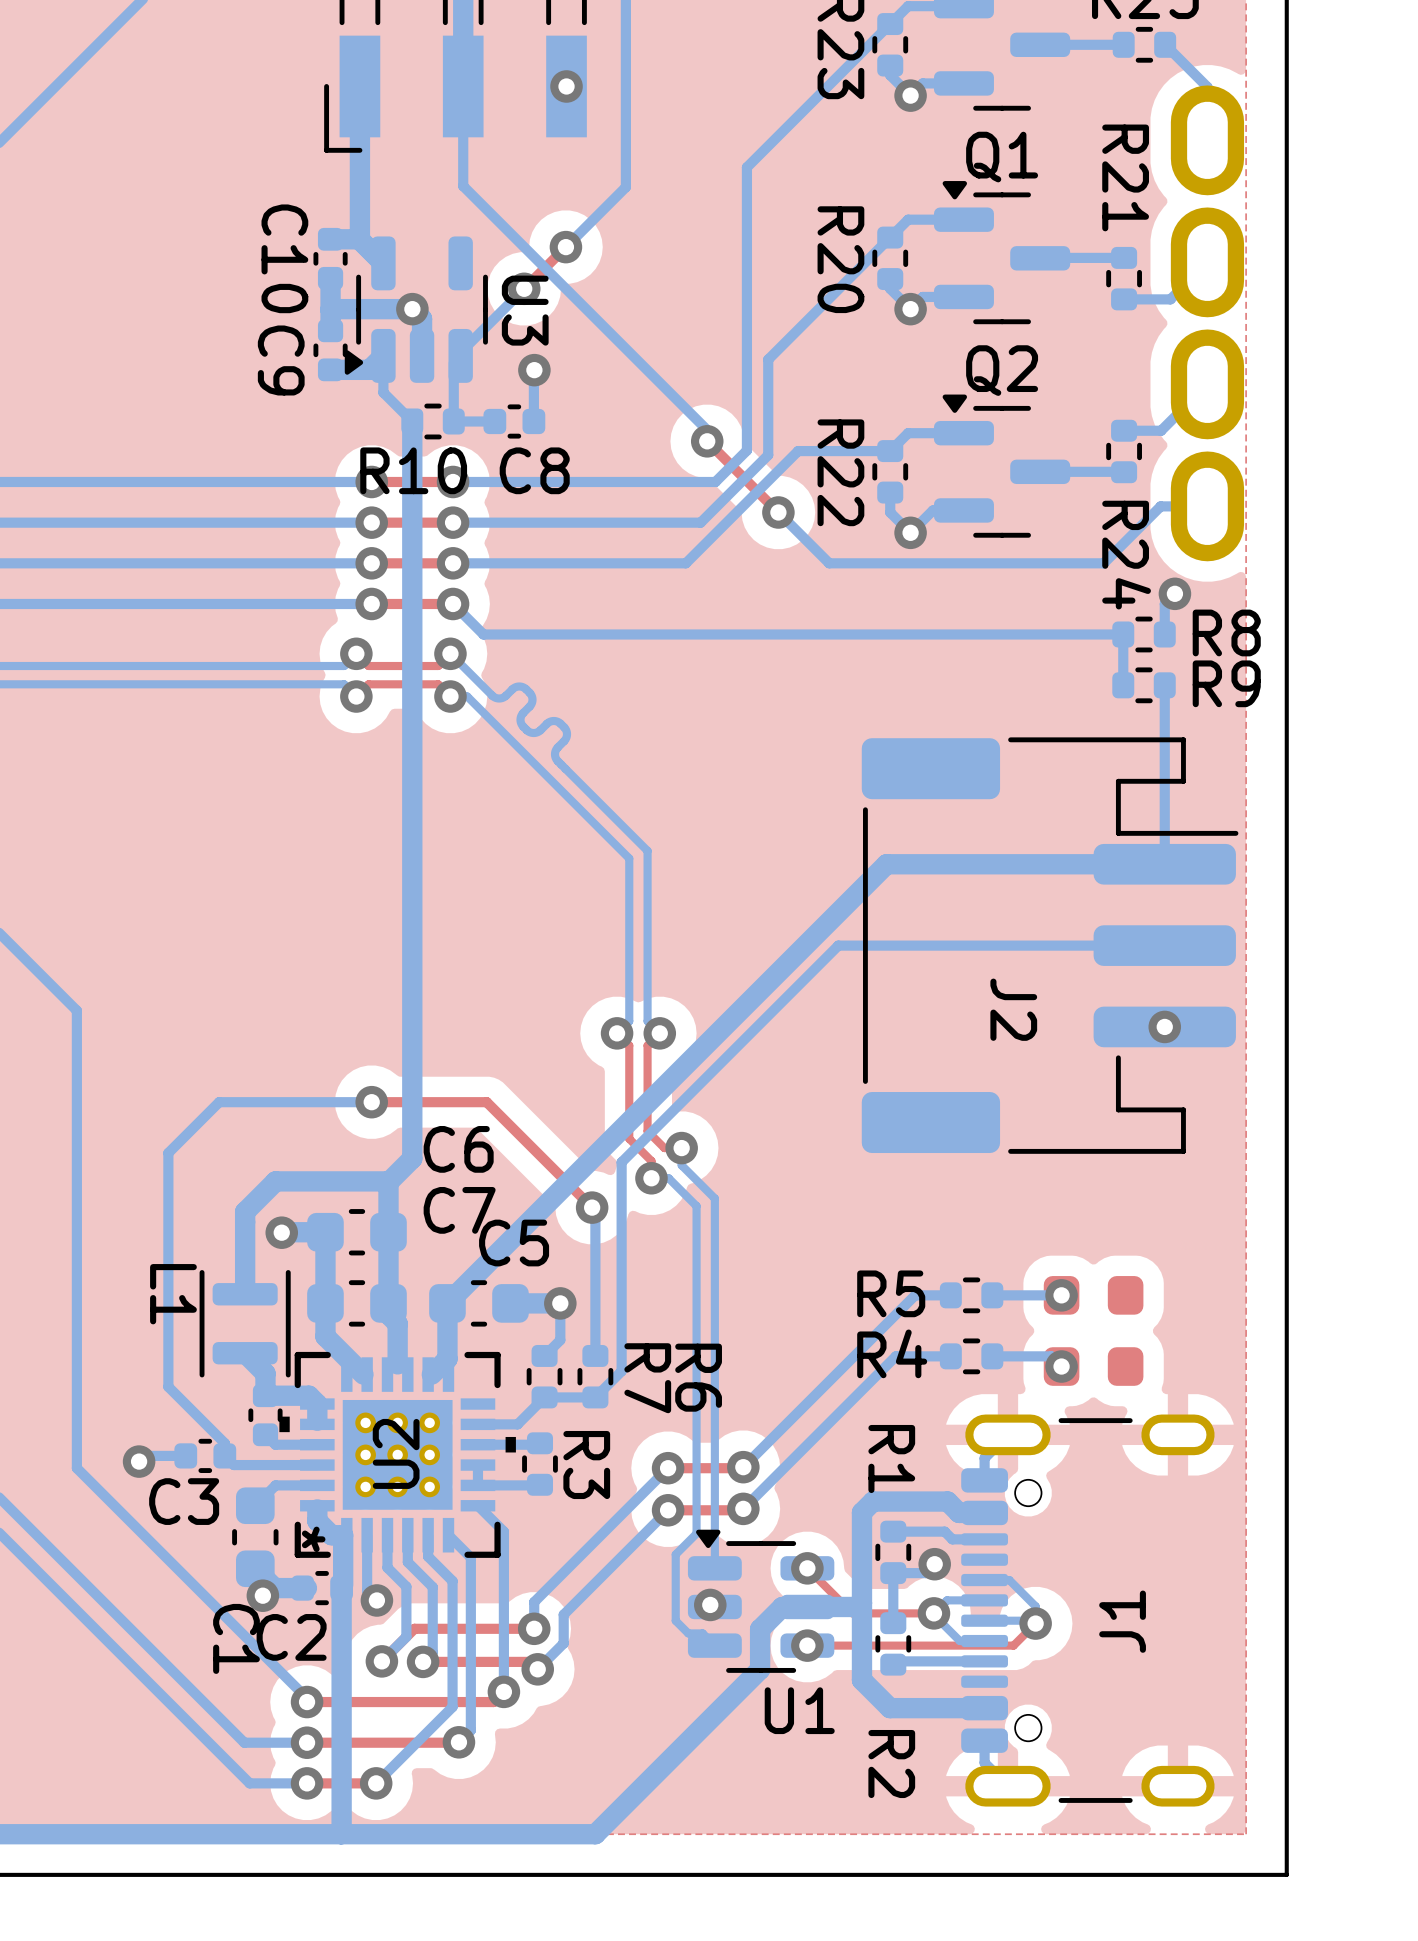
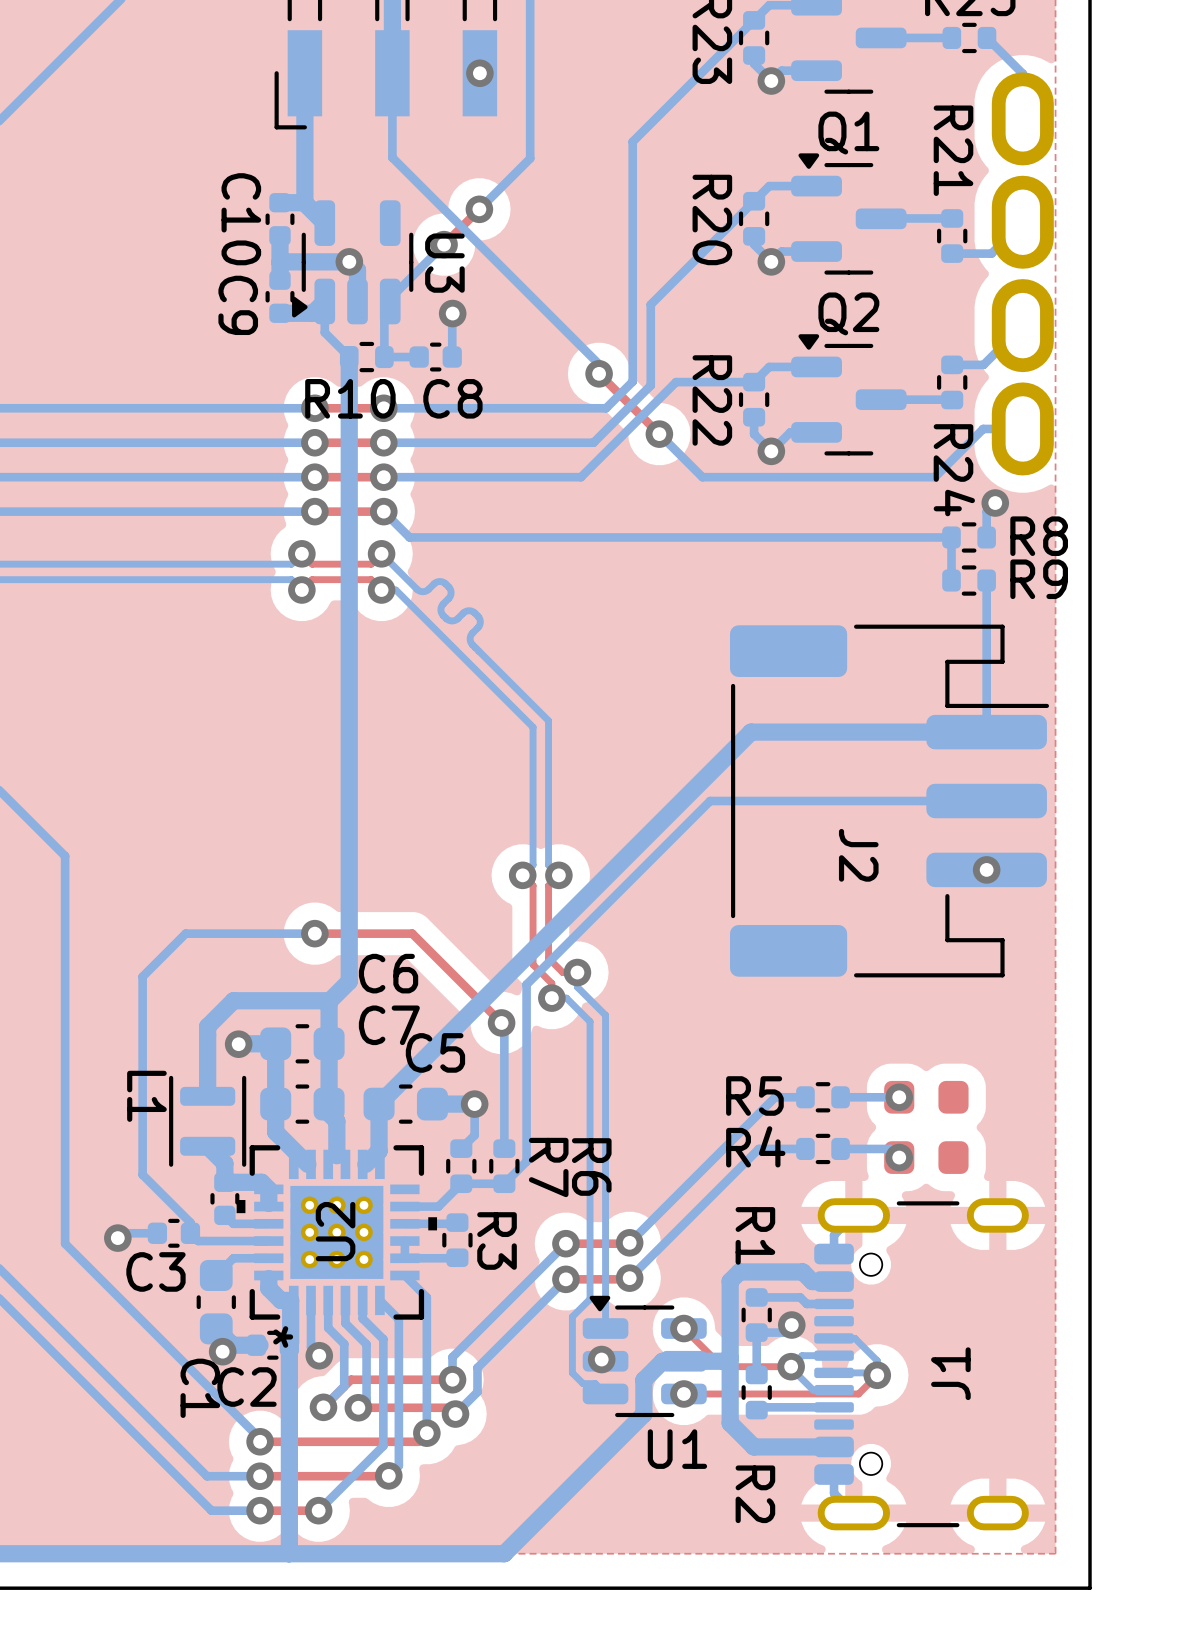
U2 text position: * (313, 1539) -> * (283, 1336)

